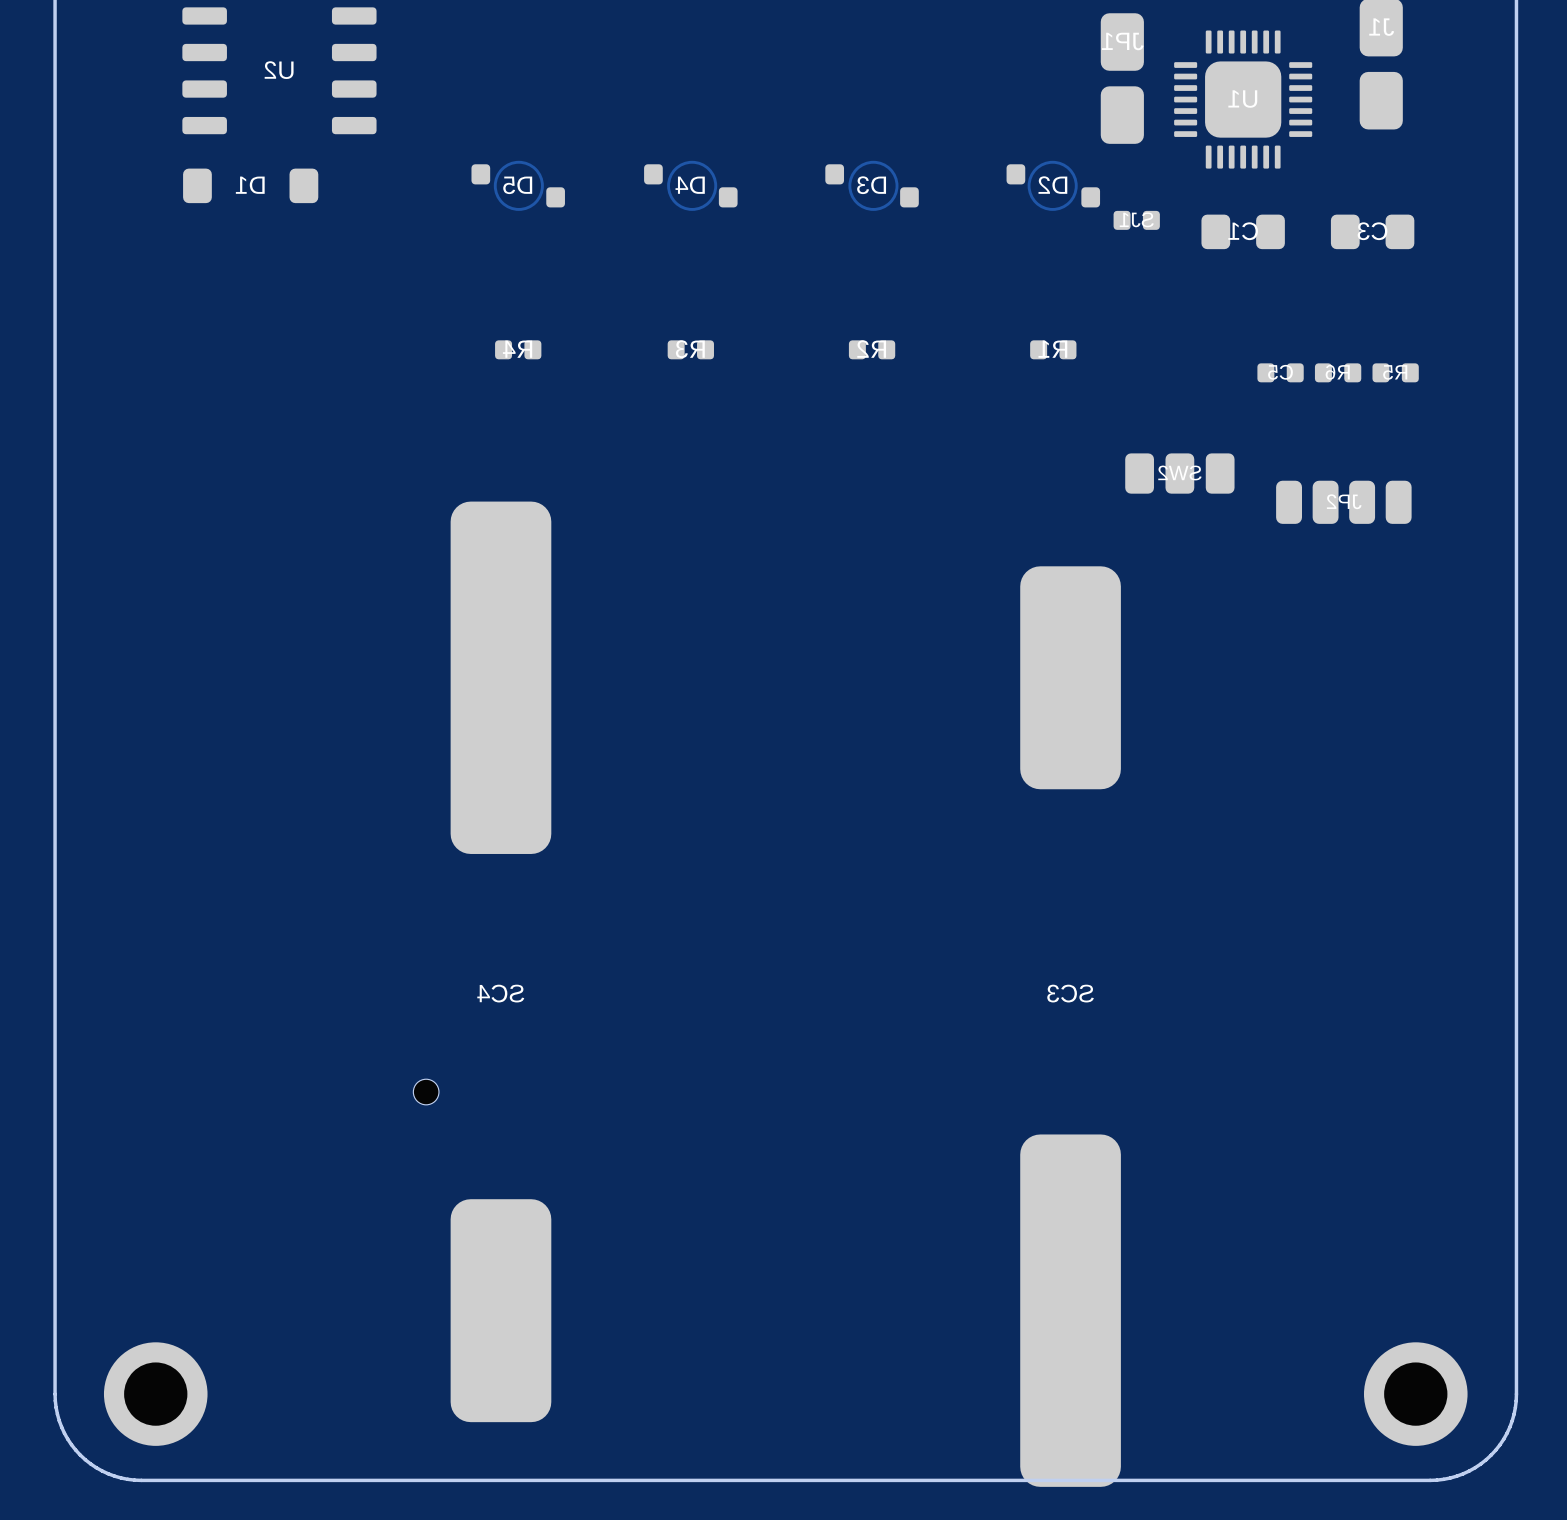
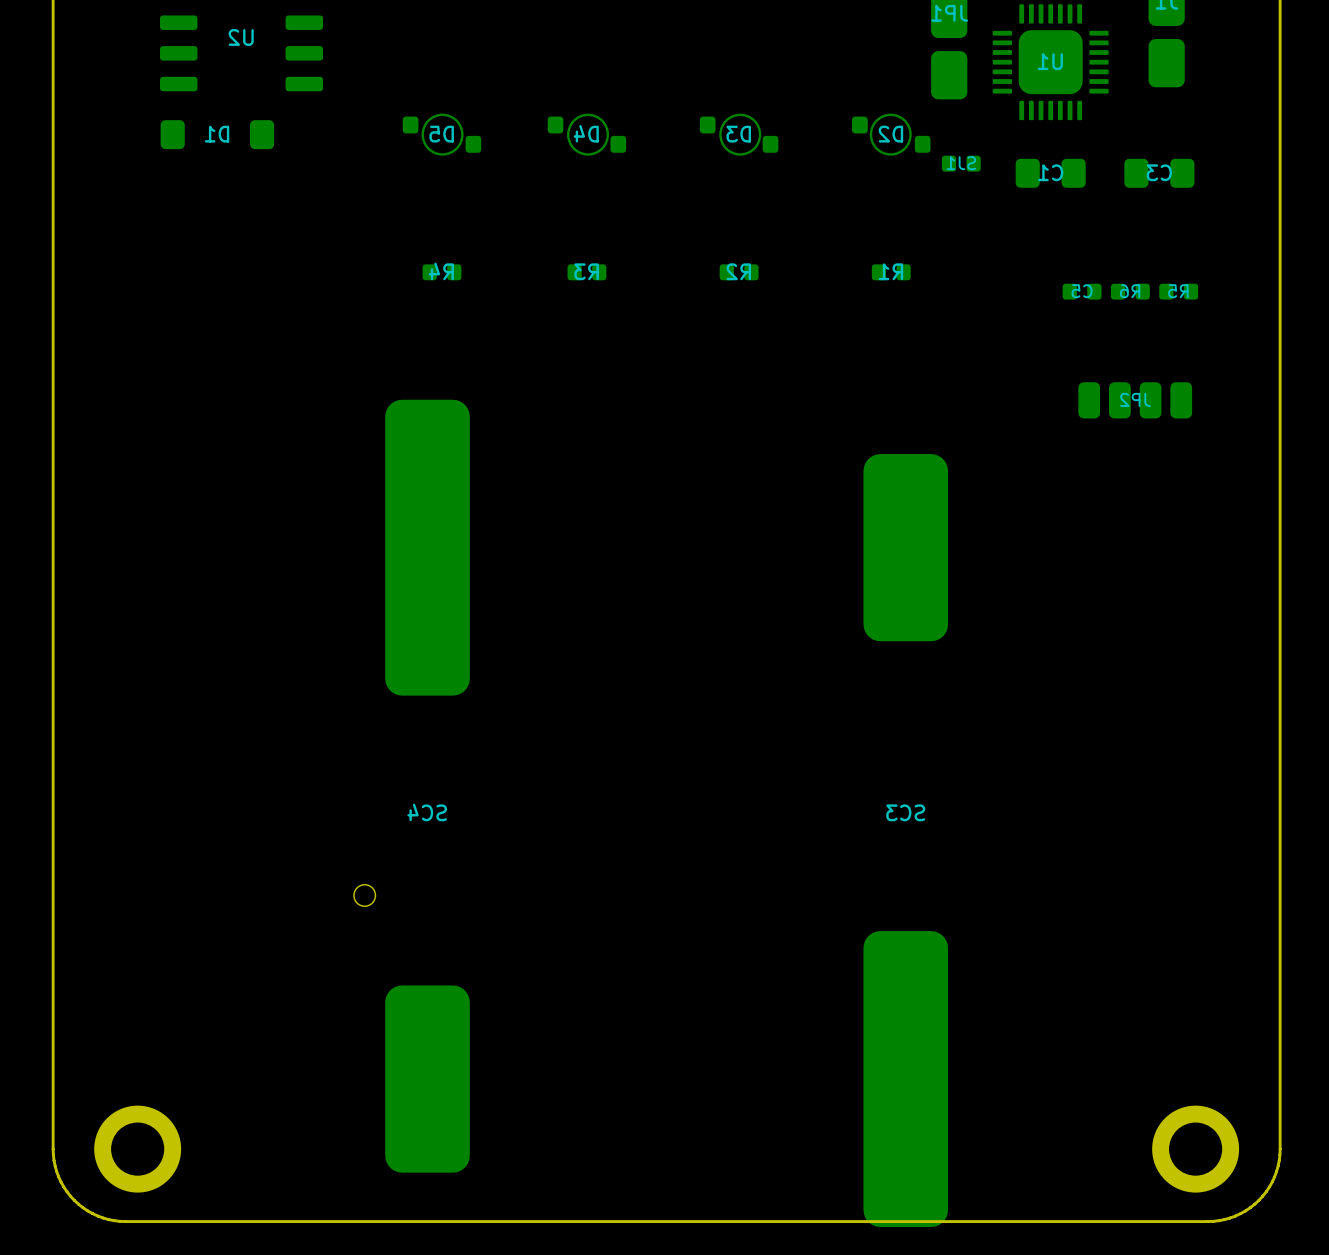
part: (1179, 473) -> none

